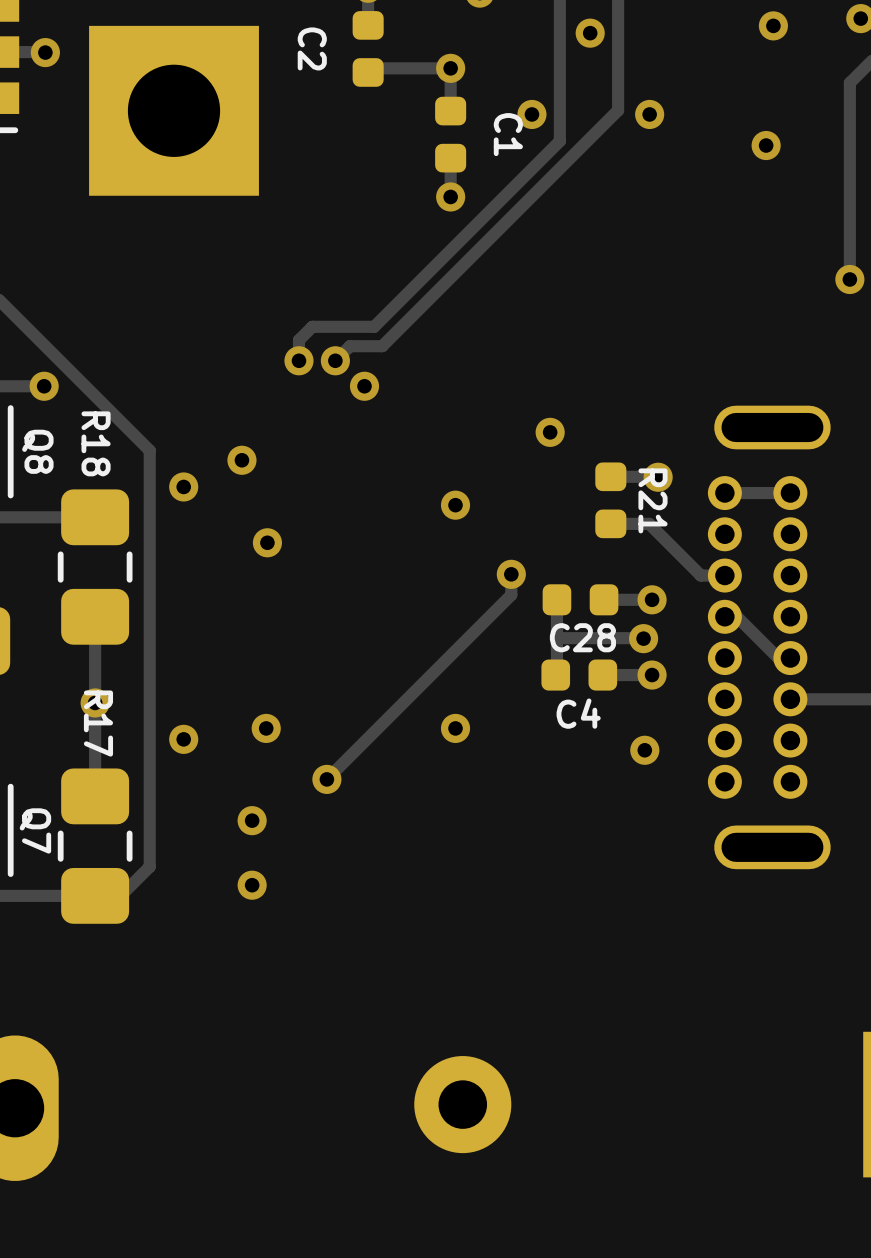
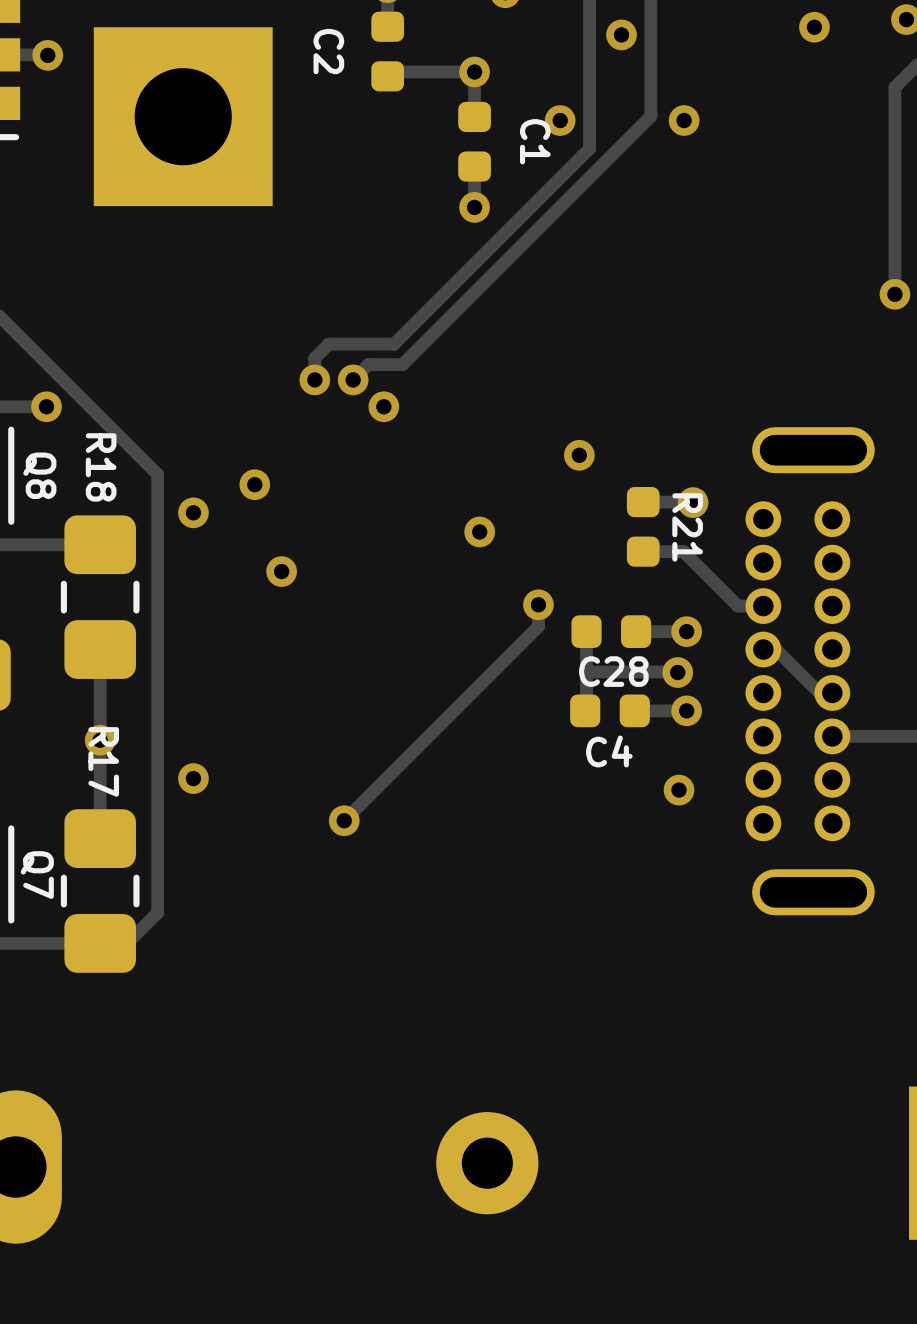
via: (766, 145) -> none
track: (790, 493) (724, 493) -> none
via: (266, 728) -> none
via: (455, 728) -> none
via: (252, 820) -> none
via: (252, 885) -> none

